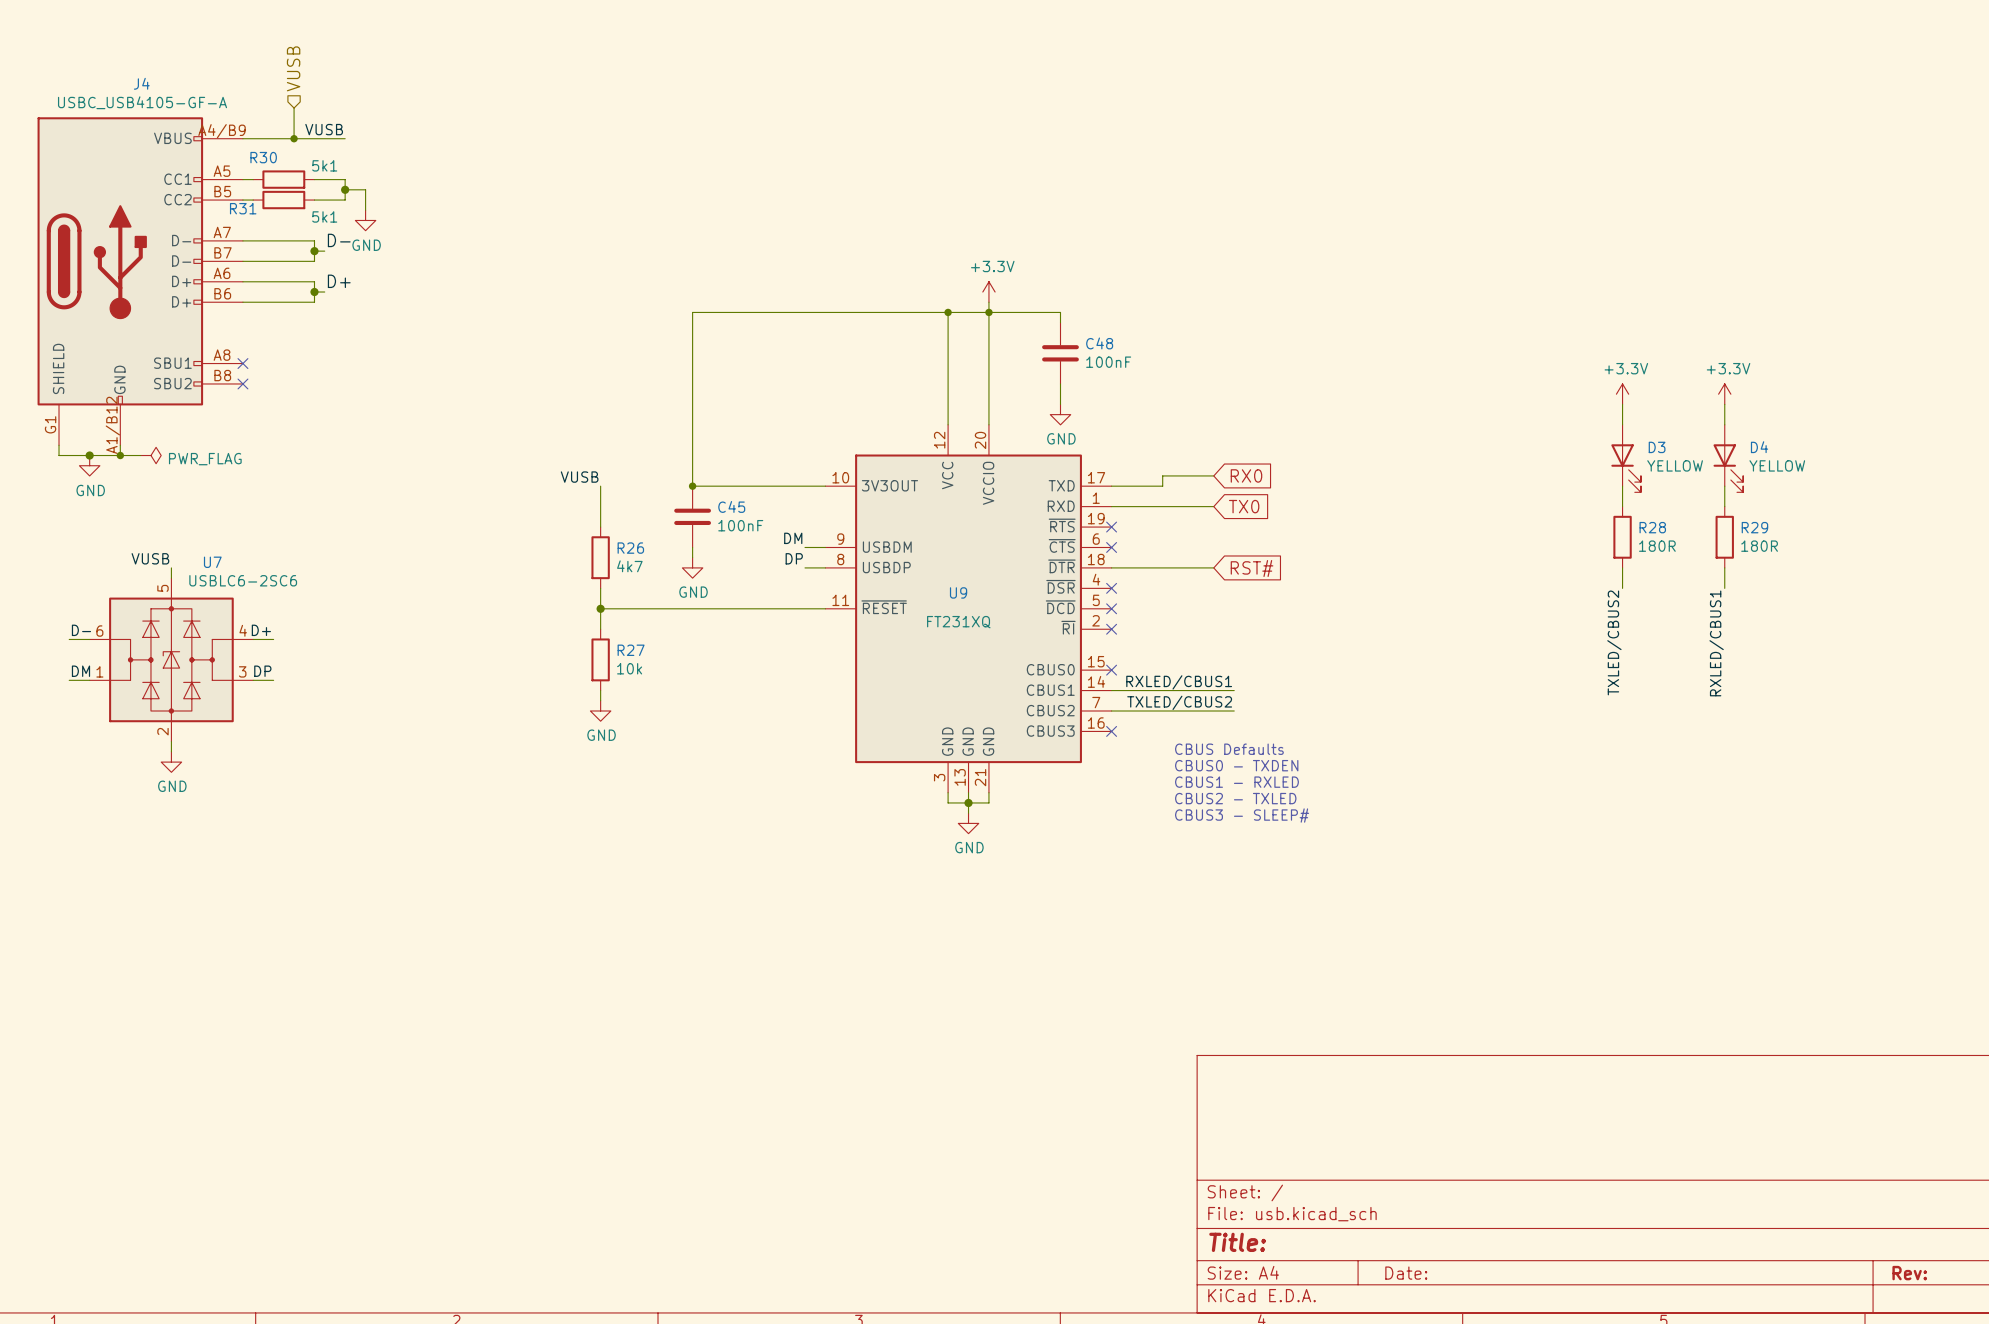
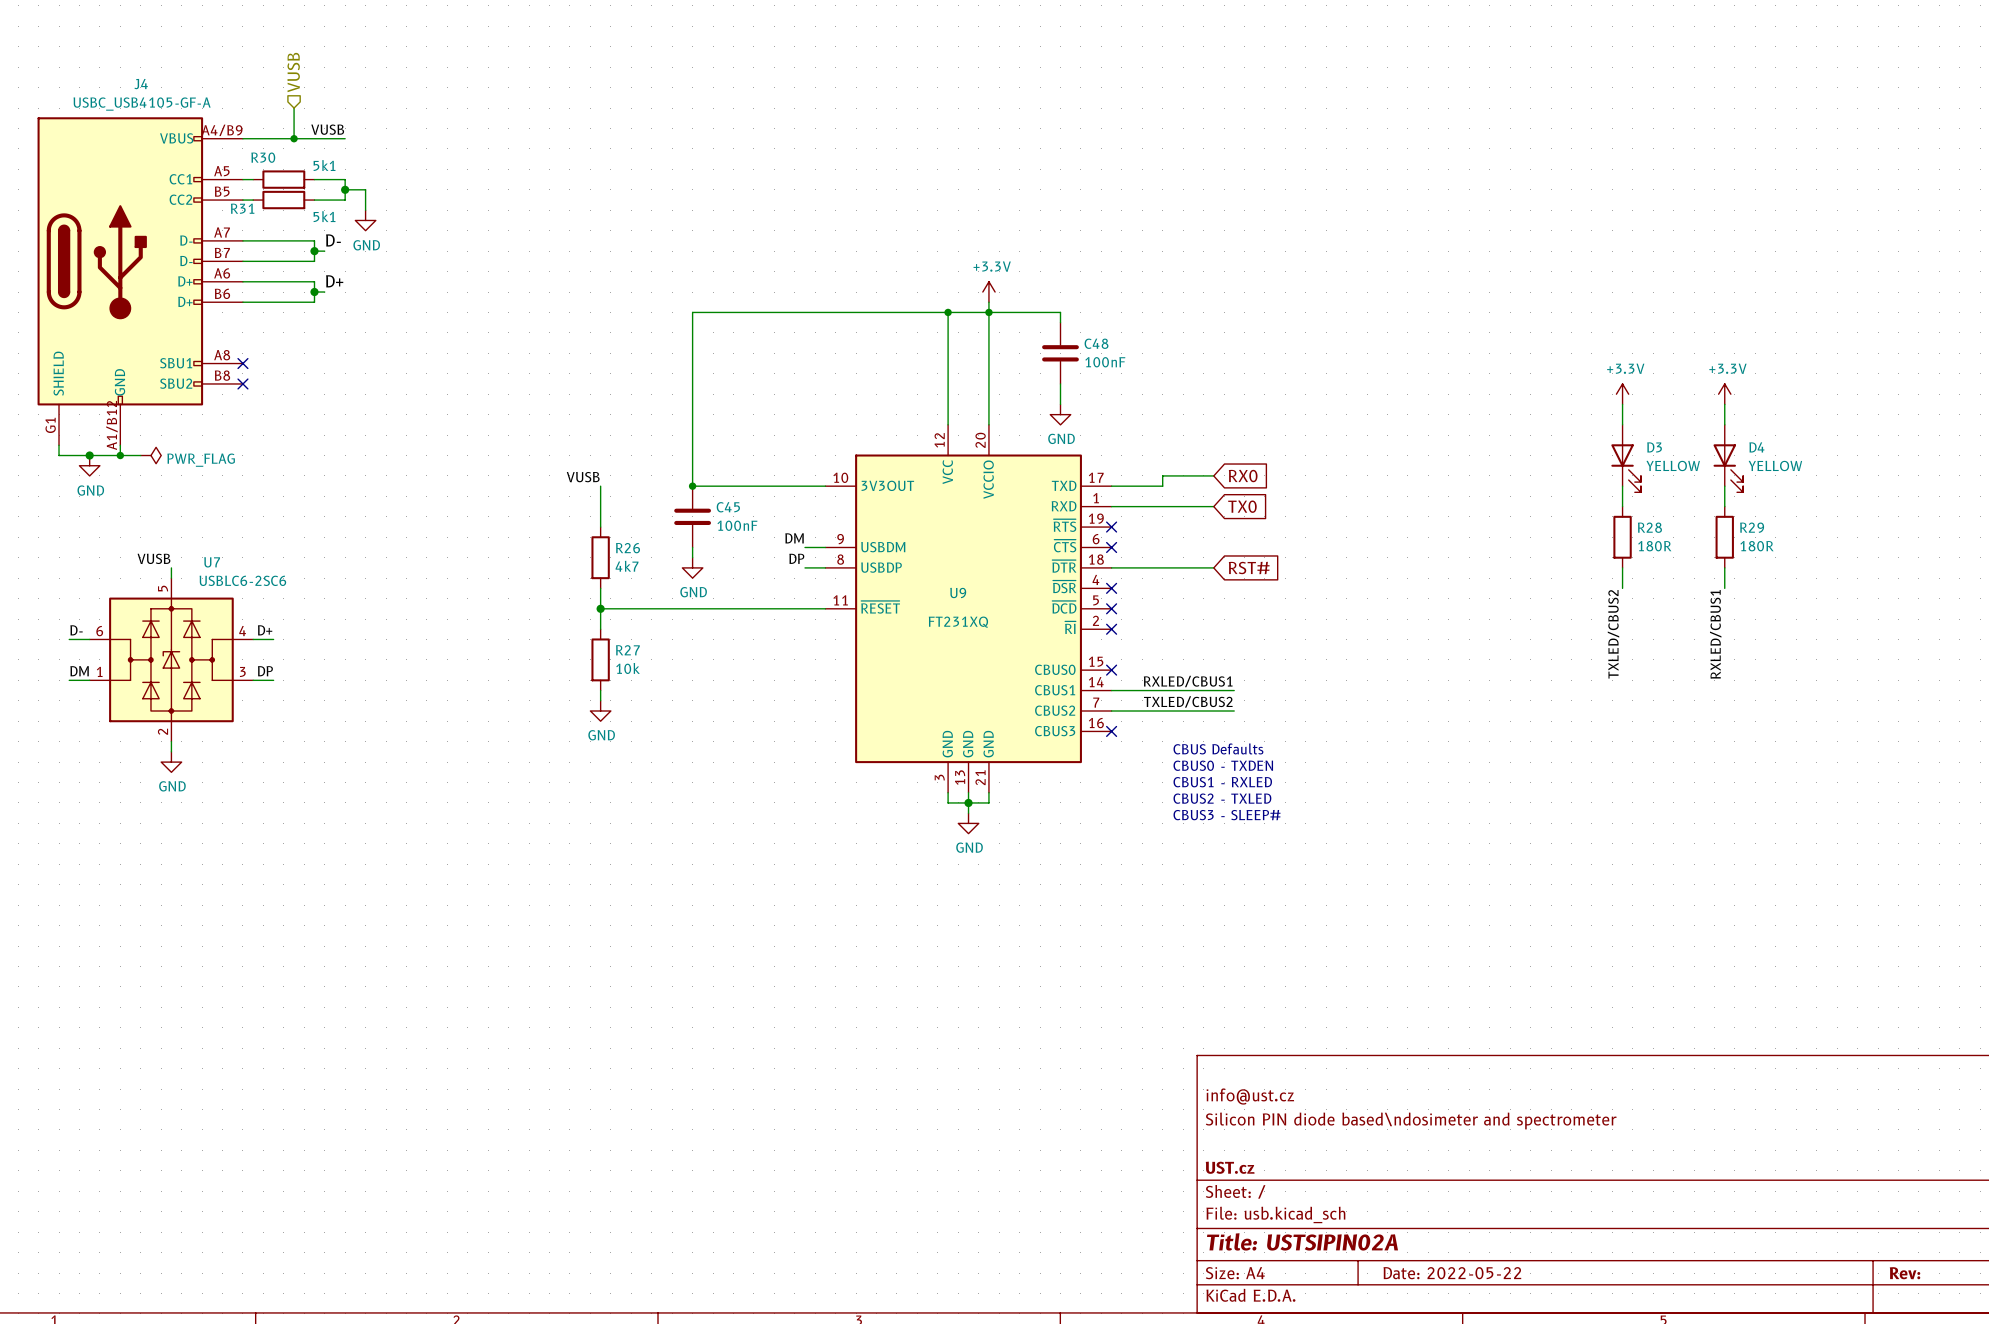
title block: none -> info@ust.cz (1250, 1096)
title block: none -> Silicon PIN diode based\ndosimeter and spectrometer (1411, 1120)
title block: none -> UST.cz (1230, 1167)
title block: Title: (1237, 1242) -> Title: USTSIPIN02A (1302, 1241)
title block: Date: (1406, 1273) -> Date: 2022-05-22 (1452, 1273)

